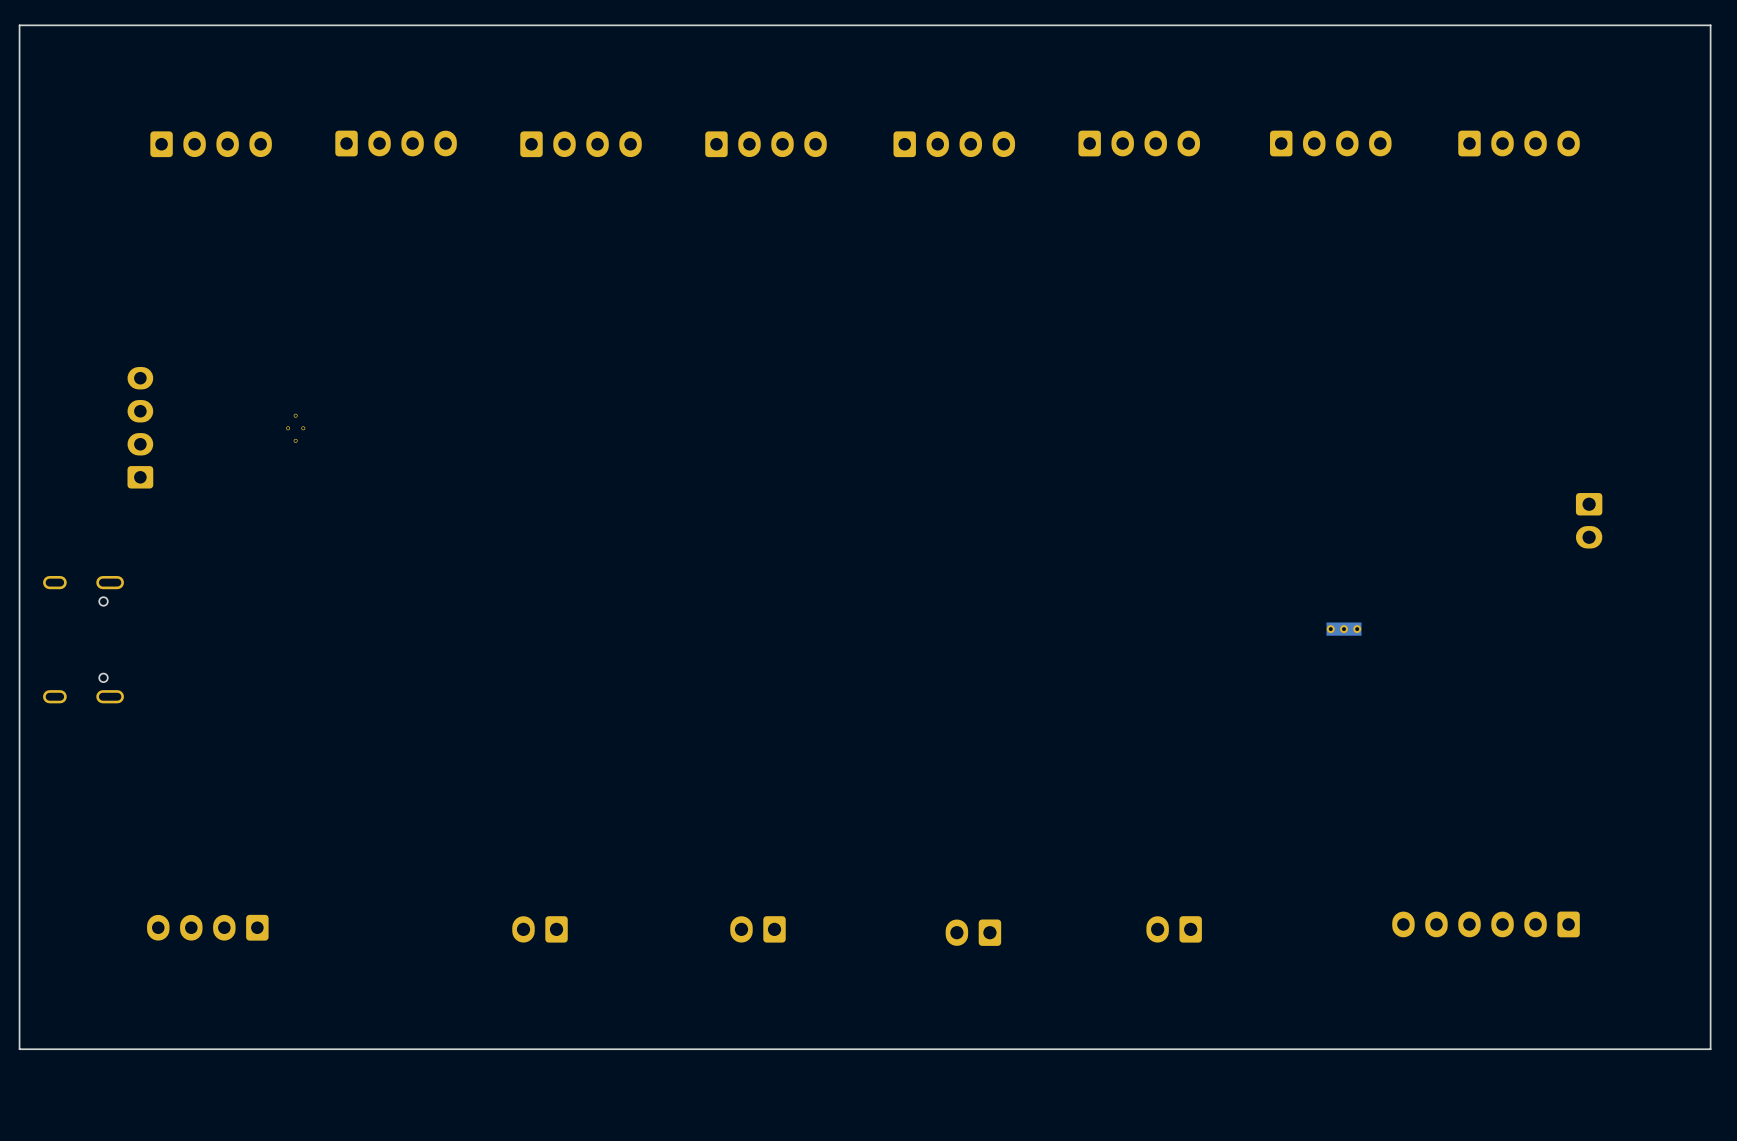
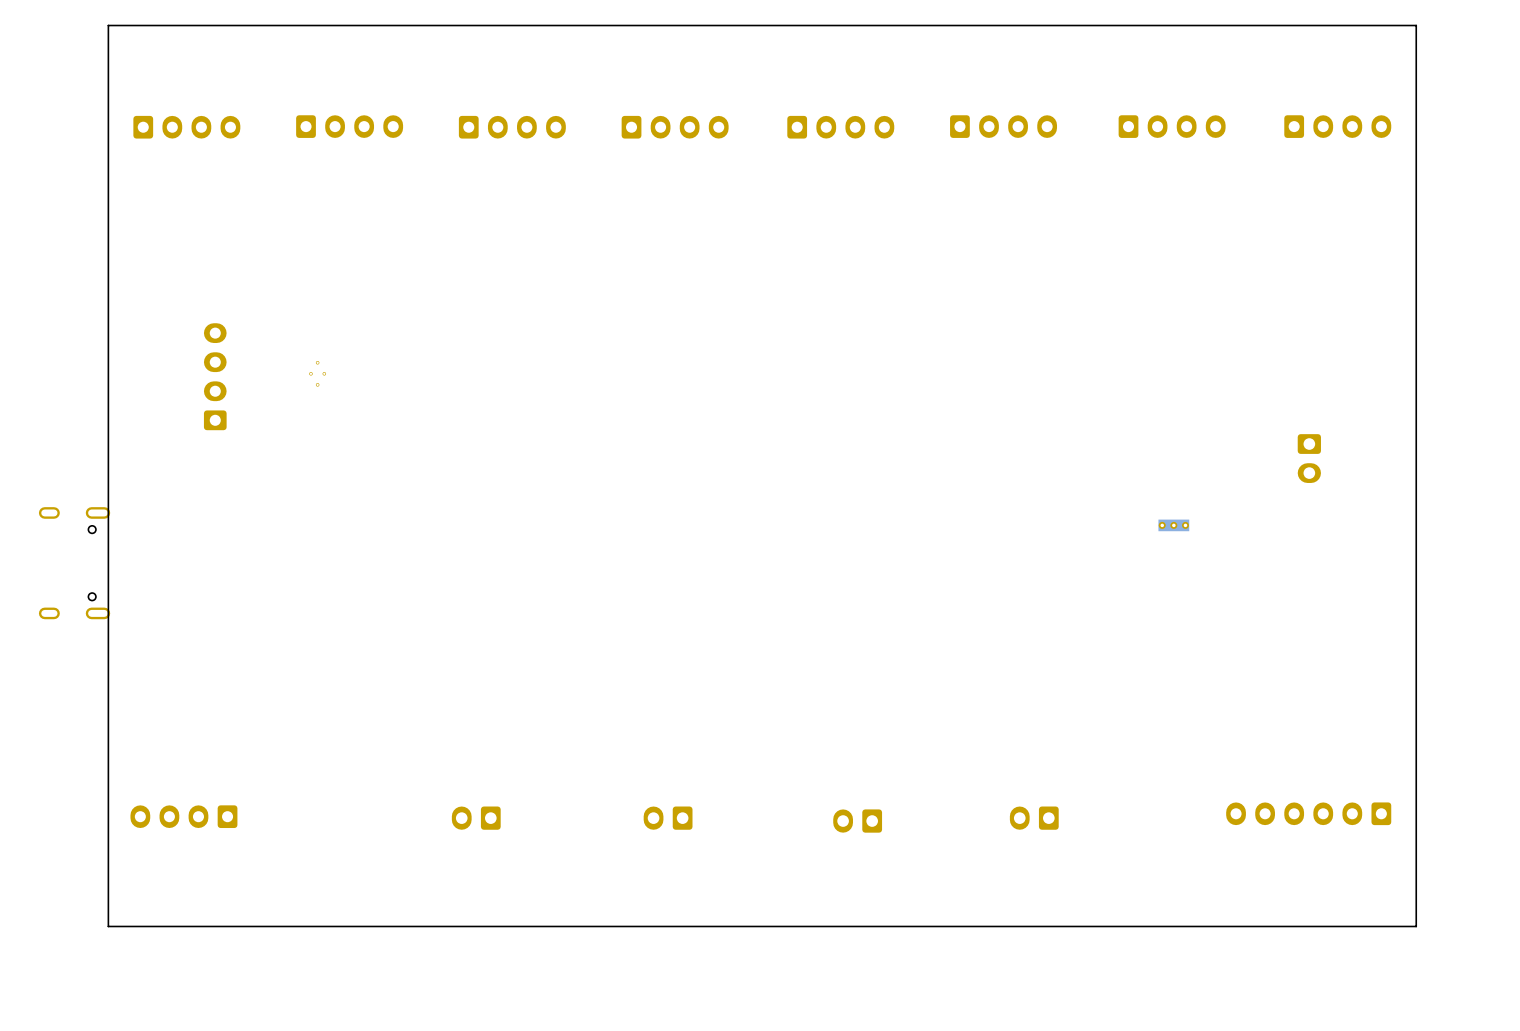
board edge: (1710, 25) (19, 25) (19, 1049) (1710, 1049) (1710, 25) -> (1416, 25) (1416, 926) (108, 926) (108, 25) (1416, 25)
part position: (140, 427) -> (215, 376)
part position: (295, 428) -> (317, 373)
part position: (1589, 520) -> (1309, 458)
part position: (1343, 629) -> (1173, 525)

